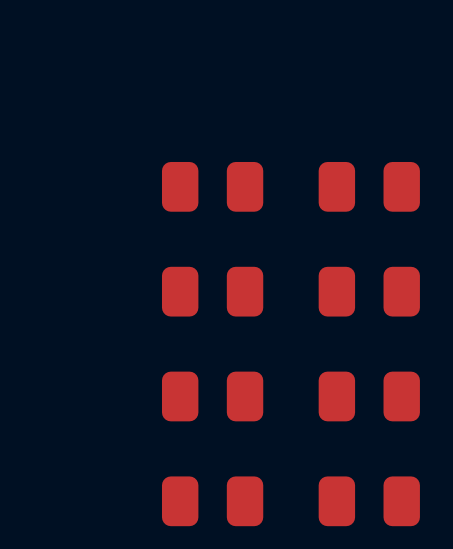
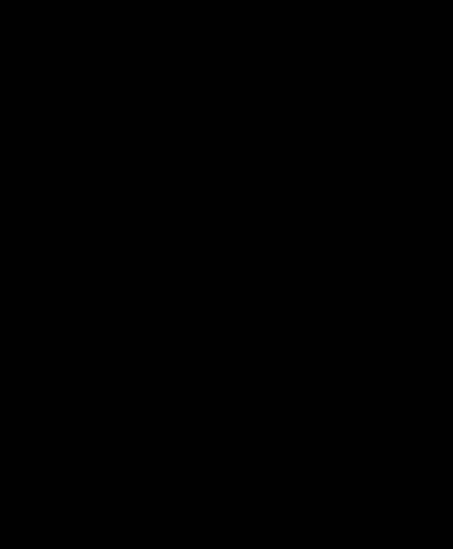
part: (212, 186) -> none
part: (369, 186) -> none
part: (212, 291) -> none
part: (369, 291) -> none
part: (212, 396) -> none
part: (369, 396) -> none
part: (212, 501) -> none
part: (369, 501) -> none

